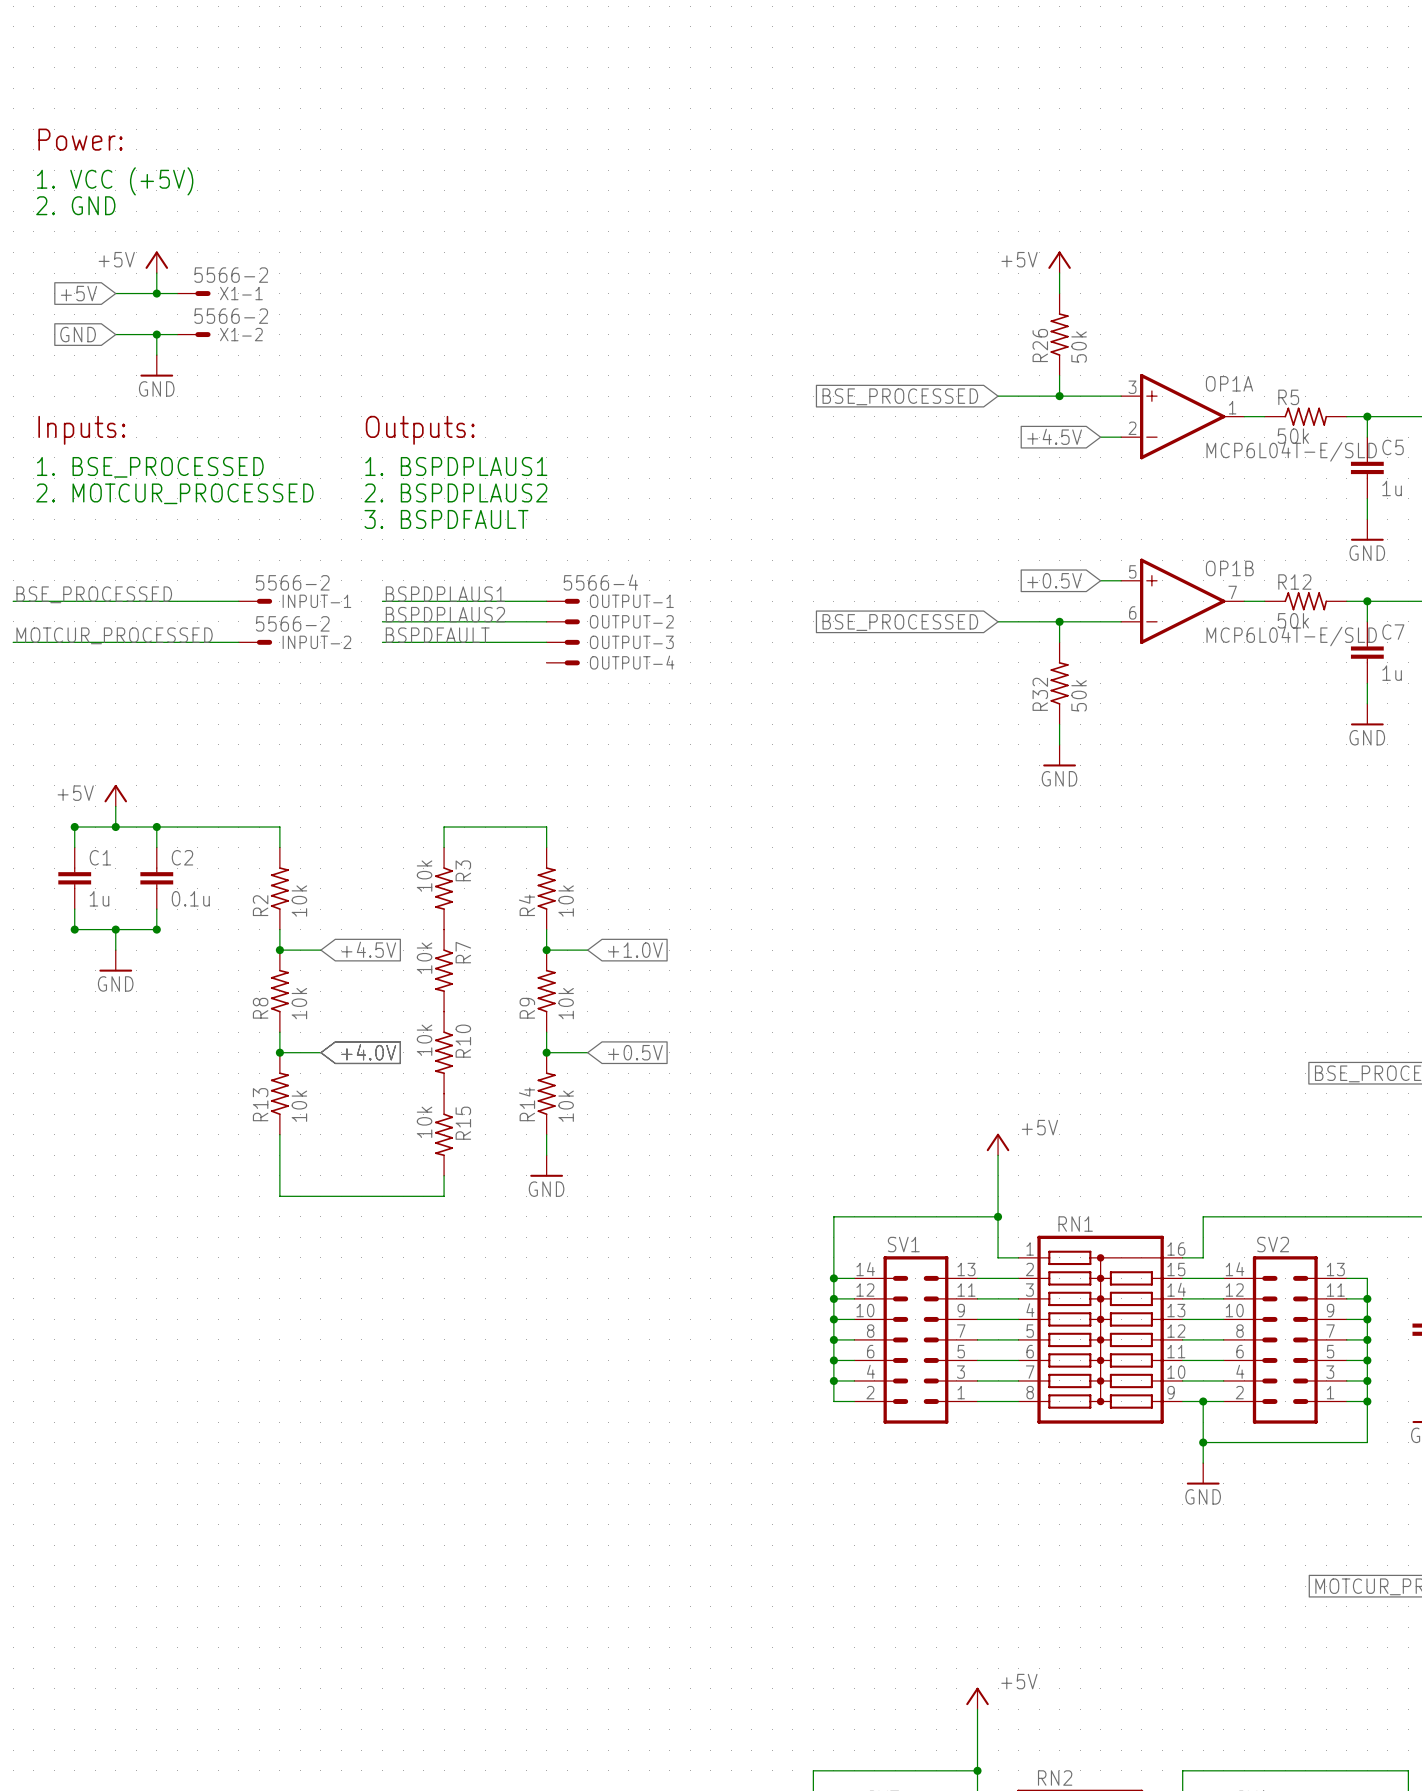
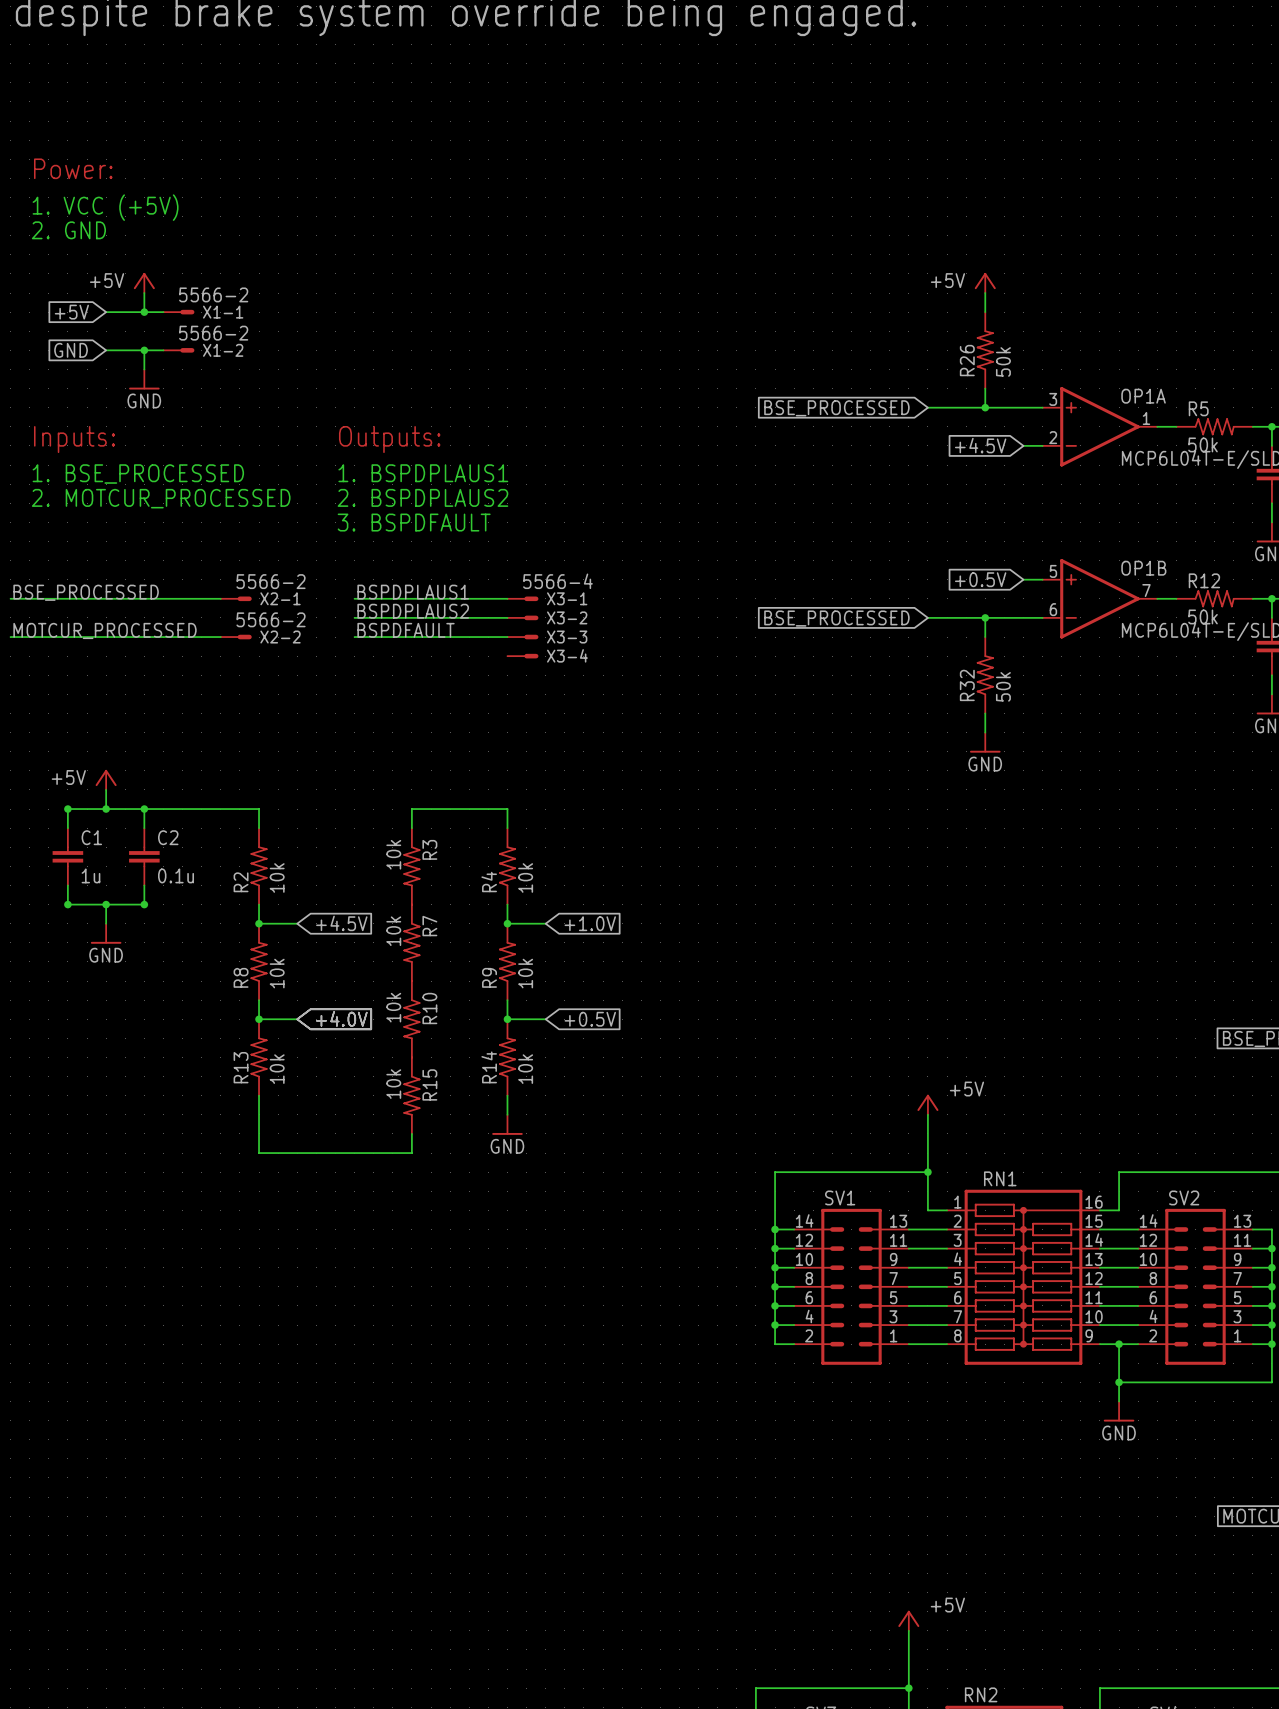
INPUT-1 name: INPUT-1 (316, 601) -> X2-1 (280, 598)
OUTPUT-1 name: OUTPUT-1 (631, 601) -> X3-1 (567, 598)
OUTPUT-2 name: OUTPUT-2 (631, 621) -> X3-2 (567, 617)
INPUT-2 name: INPUT-2 (316, 642) -> X2-2 (280, 637)
OUTPUT-3 name: OUTPUT-3 (631, 642) -> X3-3 (567, 637)
OUTPUT-4 name: OUTPUT-4 (632, 662) -> X3-4 (567, 655)

